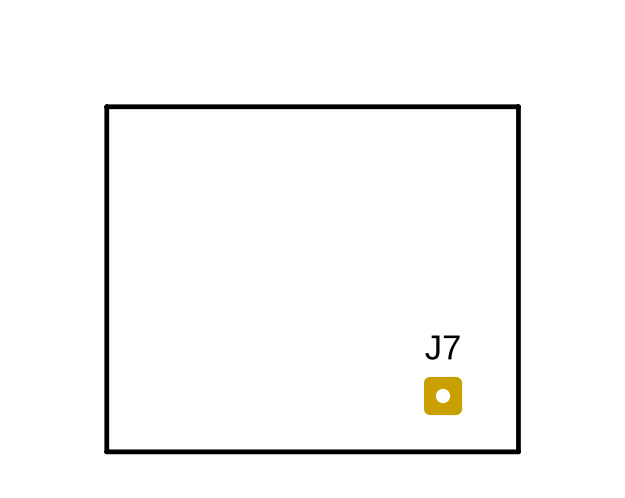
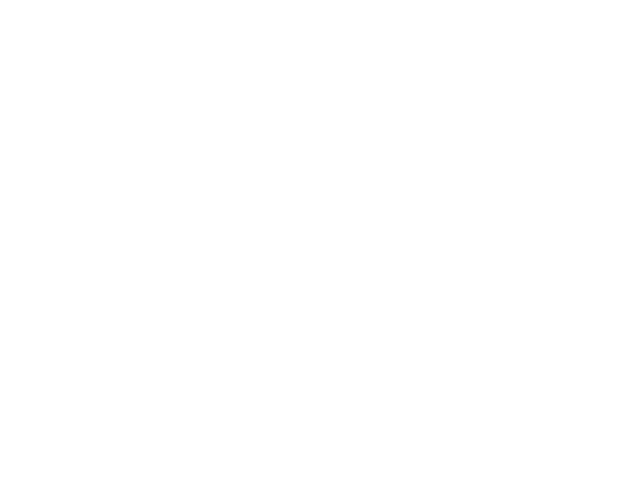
board edge: (106, 106) (518, 106) (518, 451) (106, 451) (106, 106) -> none
J7: (443, 396) -> none

